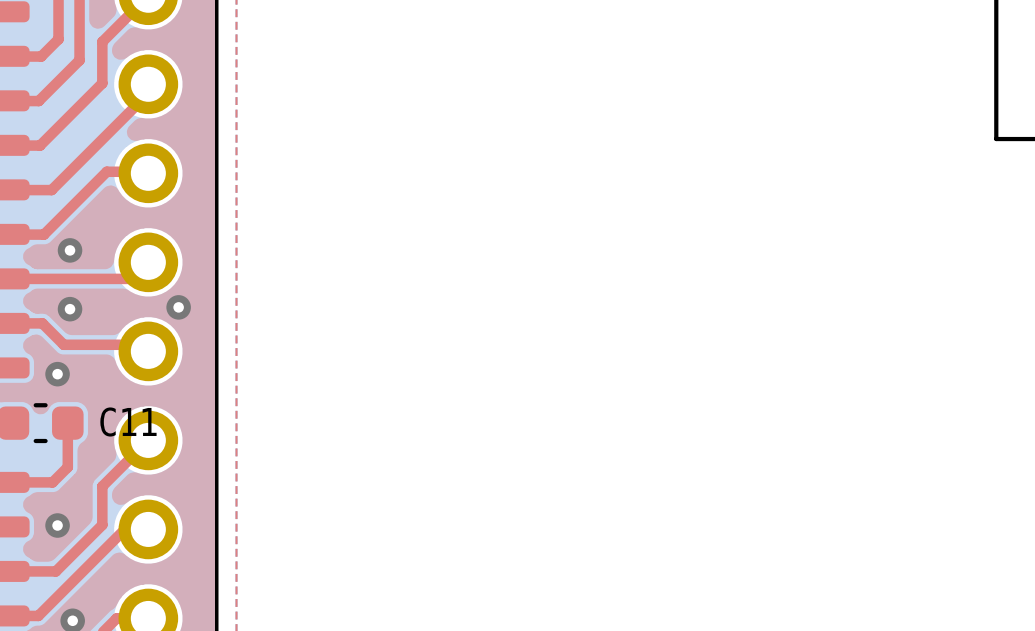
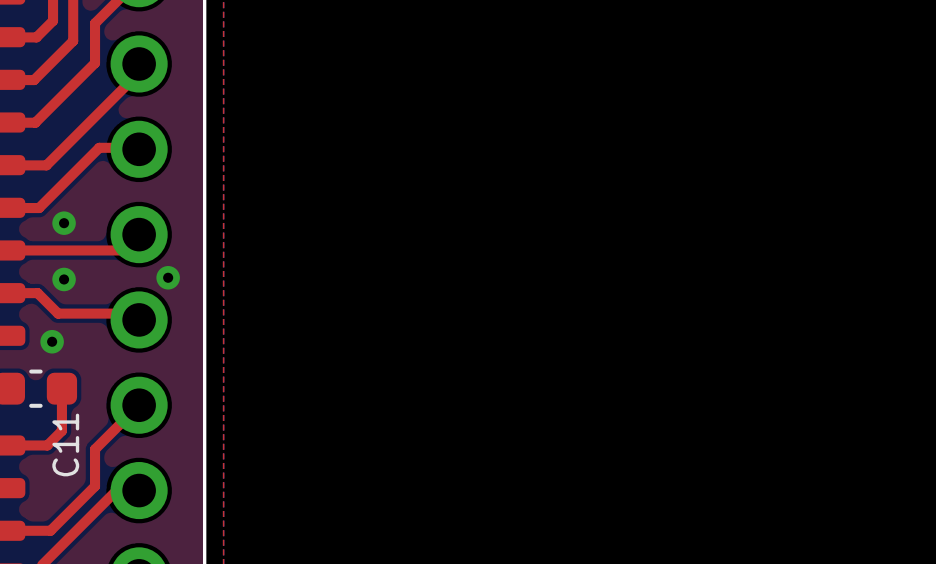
C11 name rotation: 0° (128, 422) -> 90° counterclockwise (65, 444)
via: (57, 525) -> none

